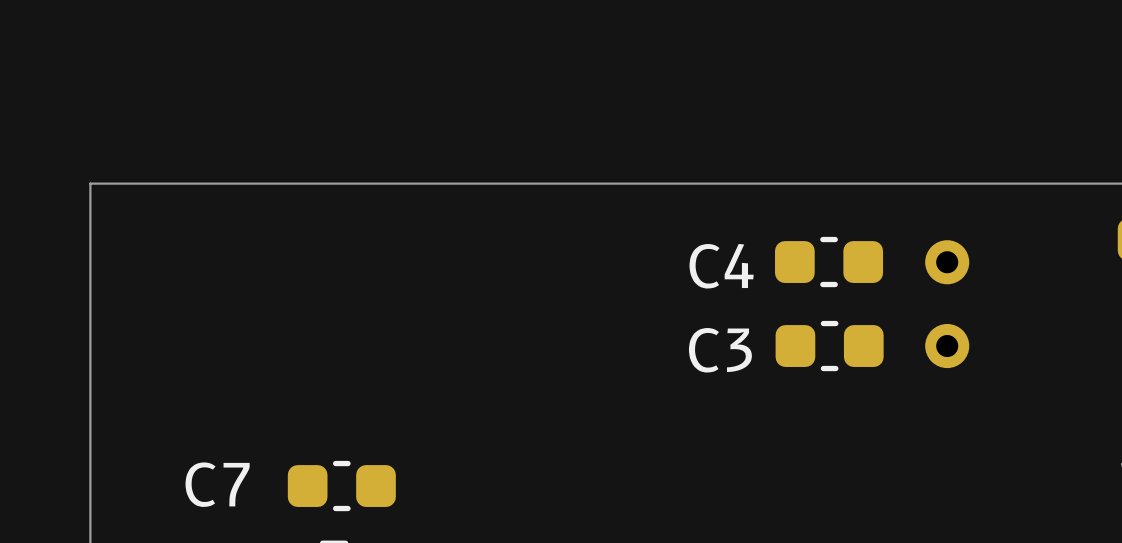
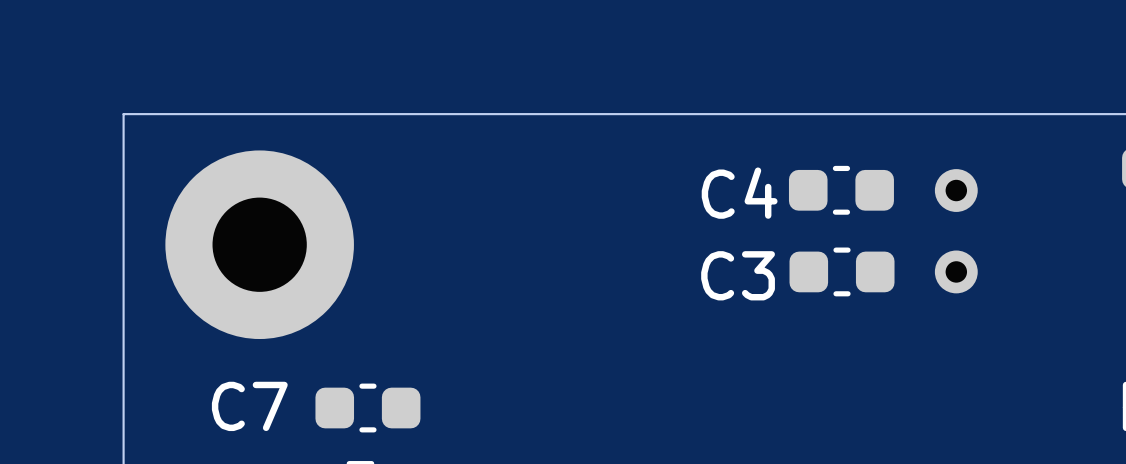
part: none -> (259, 244)

